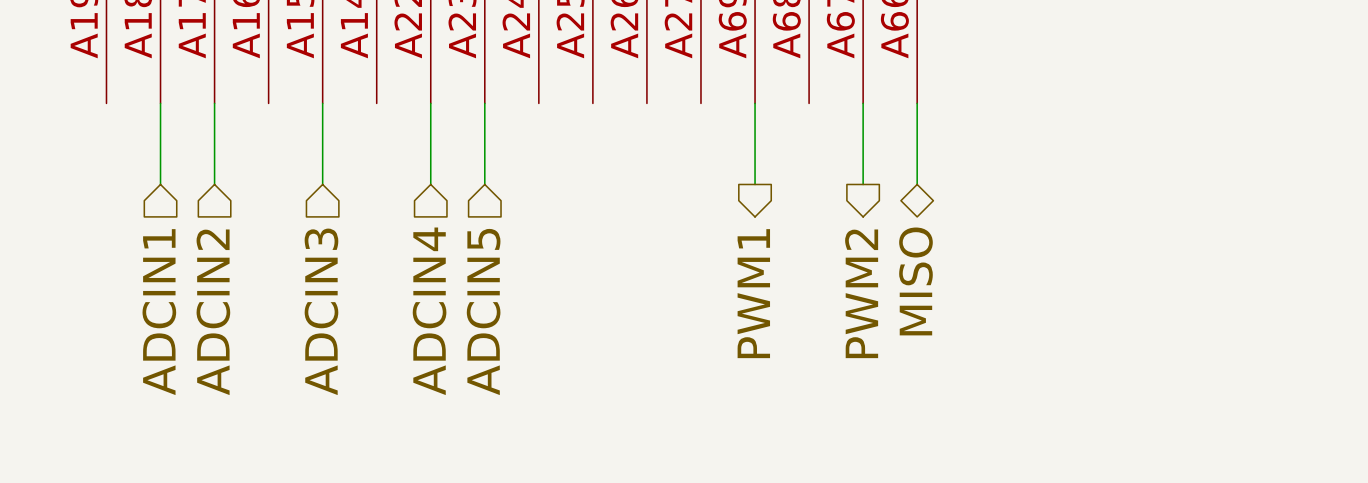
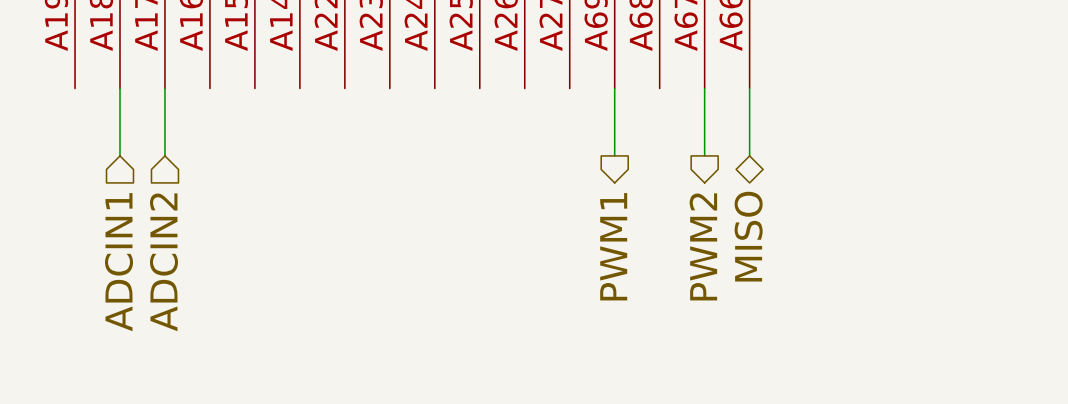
wire: (322, 103) (322, 184) -> none
wire: (430, 103) (430, 184) -> none
wire: (484, 103) (484, 184) -> none
hierarchical label: ADCIN3 (321, 311) -> none
hierarchical label: ADCIN4 (429, 311) -> none
hierarchical label: ADCIN5 (483, 312) -> none

